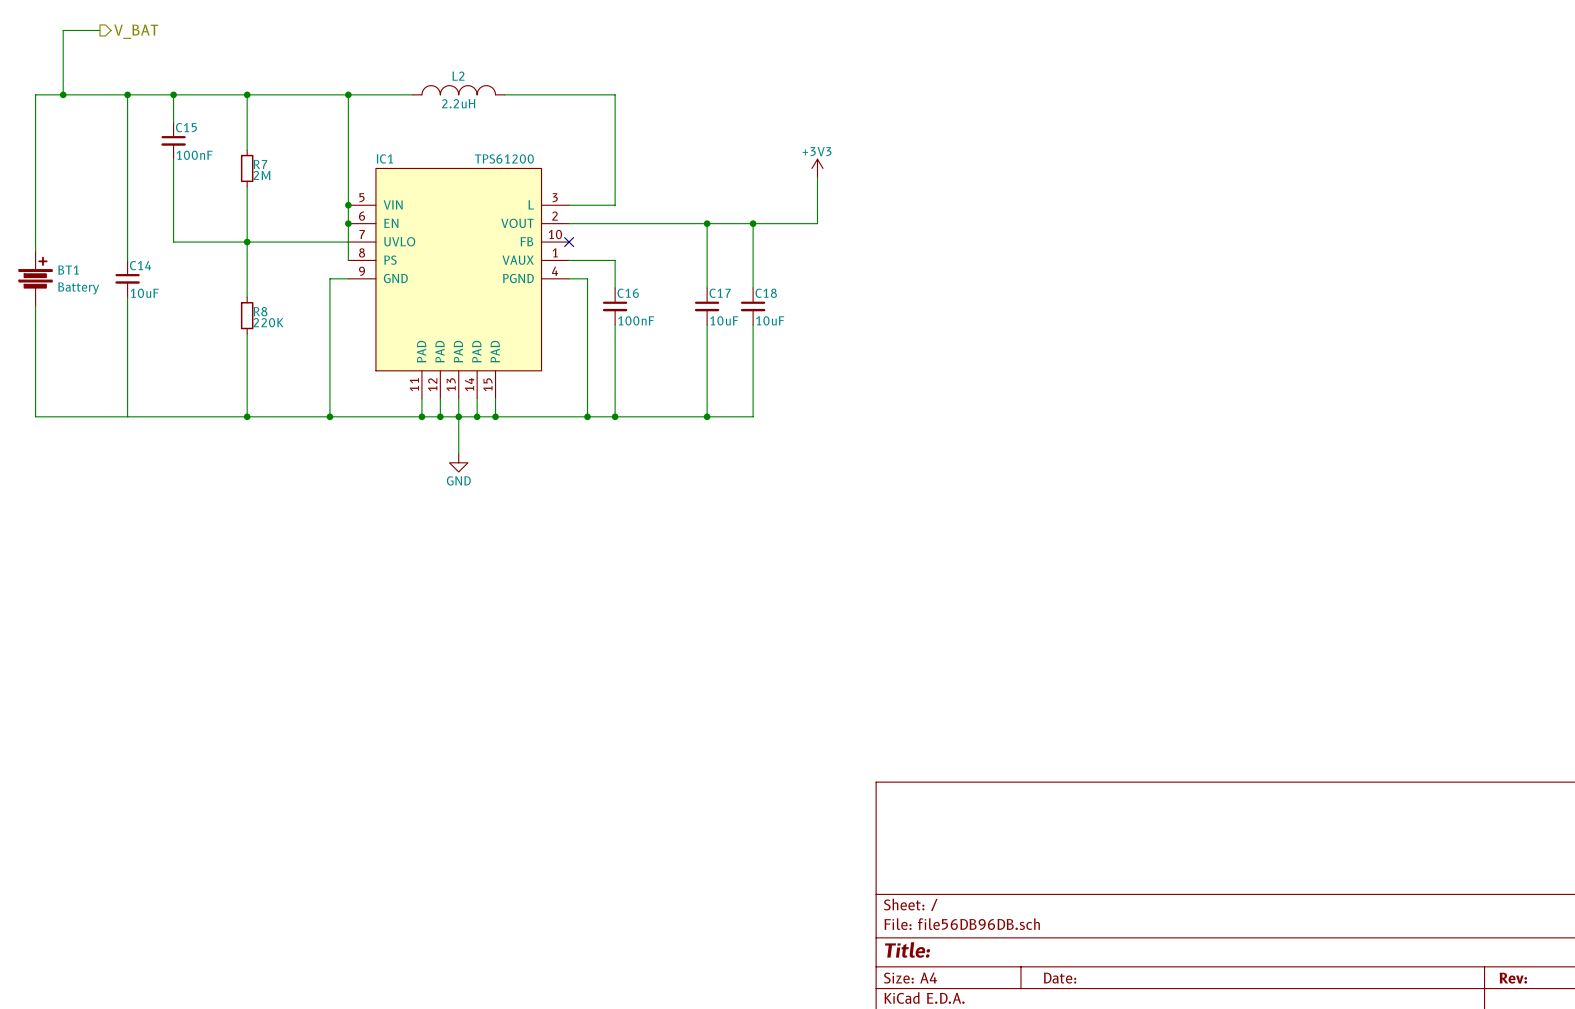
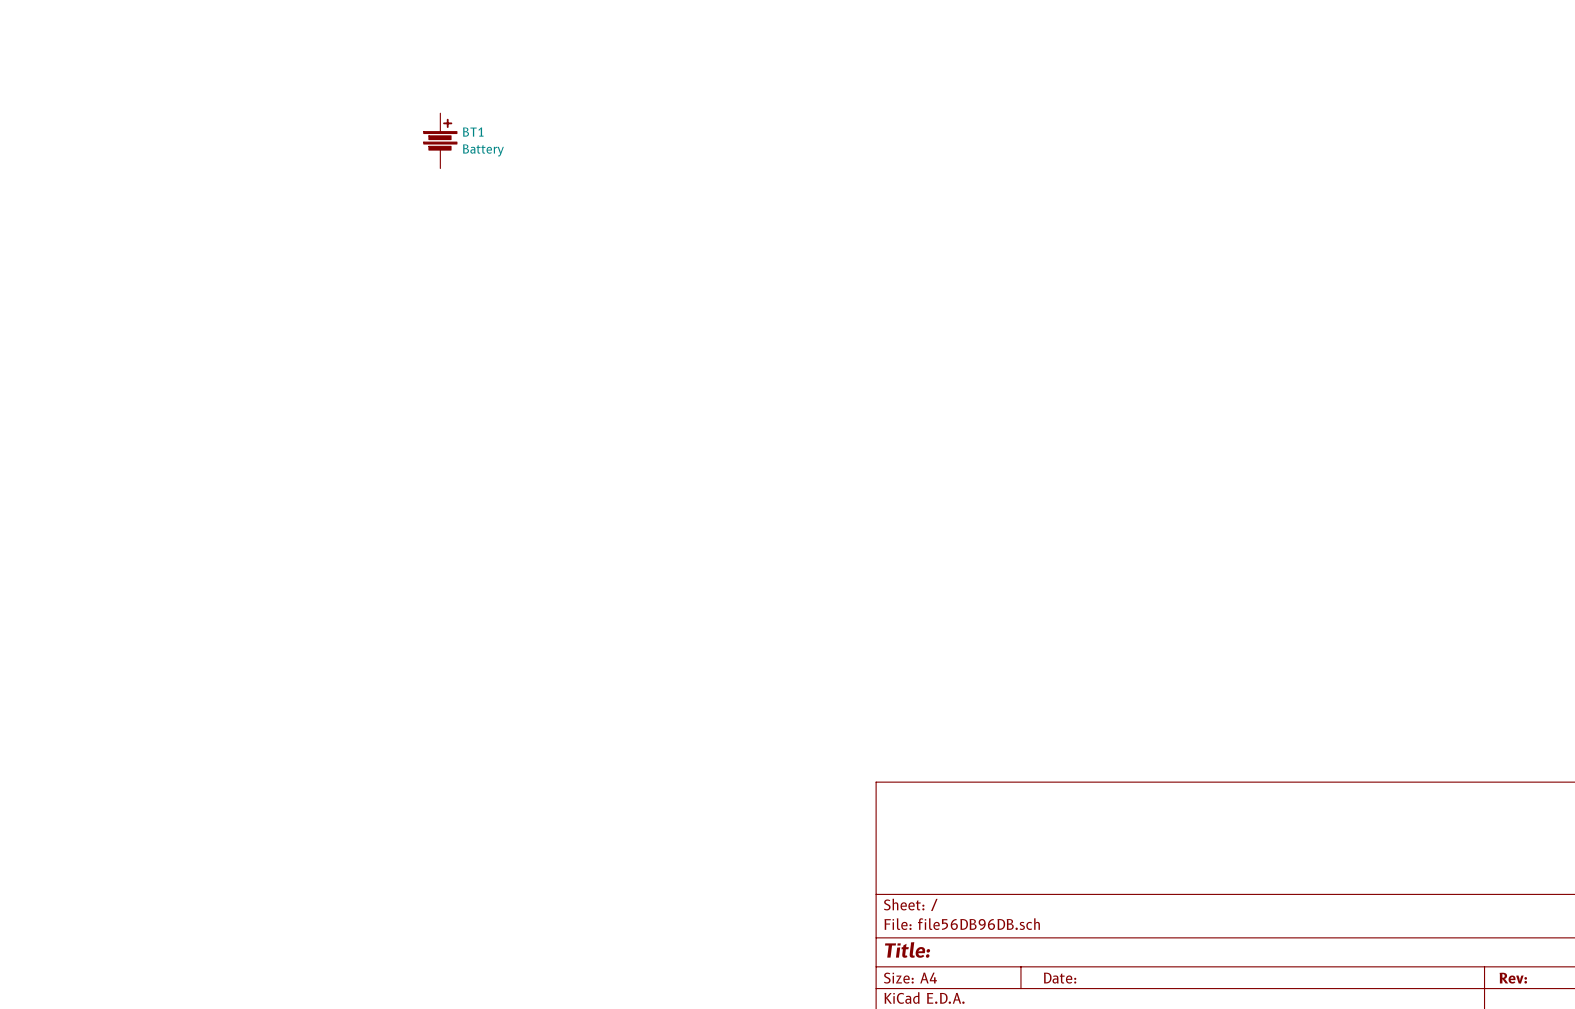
wire: (99, 30) (63, 30) (63, 94) -> none
hierarchical label: V_BAT (136, 31) -> none
L2: 2.2uH (458, 90) -> none
junction: (63, 94) -> none
wire: (127, 94) (127, 260) -> none
junction: (127, 94) -> none
wire: (173, 94) (173, 122) -> none
junction: (173, 94) -> none
wire: (247, 94) (247, 150) -> none
junction: (247, 94) -> none
wire: (348, 94) (348, 260) -> none
junction: (348, 94) -> none
wire: (412, 94) (35, 94) (35, 251) -> none
wire: (504, 94) (615, 94) (615, 205) (569, 205) -> none
C15: 100nF (173, 140) -> none
wire: (173, 159) (173, 242) (348, 242) -> none
R7: 2M (247, 168) -> none
power symbol: +3V3 (817, 168) -> none
wire: (817, 177) (817, 223) (569, 223) -> none
wire: (247, 186) (247, 297) -> none
junction: (348, 205) -> none
junction: (348, 223) -> none
wire: (707, 223) (707, 288) -> none
junction: (707, 223) -> none
wire: (753, 223) (753, 288) -> none
junction: (753, 223) -> none
junction: (247, 242) -> none
no-connect mark: (569, 242) -> none
wire: (569, 260) (615, 260) (615, 288) -> none
BT1 position: (35, 278) -> (440, 140)
C14: 10uF (127, 278) -> none
wire: (348, 278) (329, 278) (329, 416) -> none
wire: (569, 278) (587, 278) (587, 416) -> none
IC1: TPS61200 (458, 283) -> none
wire: (127, 297) (127, 416) -> none
wire: (35, 306) (35, 416) (753, 416) (753, 324) -> none
C16: 100nF (615, 306) -> none
C17: 10uF (707, 306) -> none
C18: 10uF (753, 306) -> none
R8: 220K (247, 315) -> none
wire: (615, 324) (615, 416) -> none
wire: (707, 324) (707, 416) -> none
wire: (247, 334) (247, 416) -> none
wire: (421, 398) (421, 416) -> none
wire: (440, 398) (440, 416) -> none
wire: (458, 398) (458, 453) -> none
wire: (477, 398) (477, 416) -> none
wire: (495, 398) (495, 416) -> none
junction: (247, 416) -> none
junction: (329, 416) -> none
junction: (421, 416) -> none
junction: (440, 416) -> none
junction: (458, 416) -> none
junction: (477, 416) -> none
junction: (495, 416) -> none
junction: (587, 416) -> none
junction: (615, 416) -> none
junction: (707, 416) -> none
power symbol: GND (458, 462) -> none

